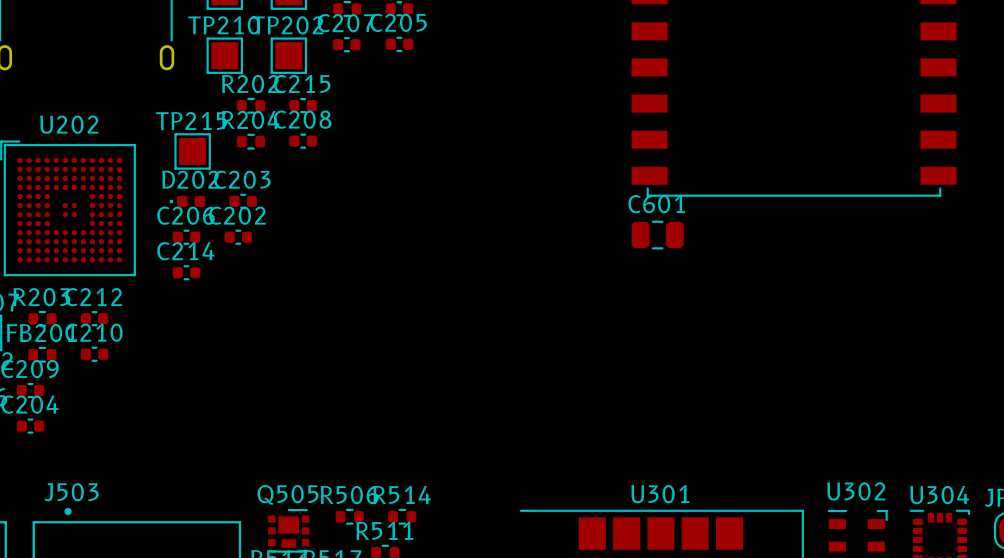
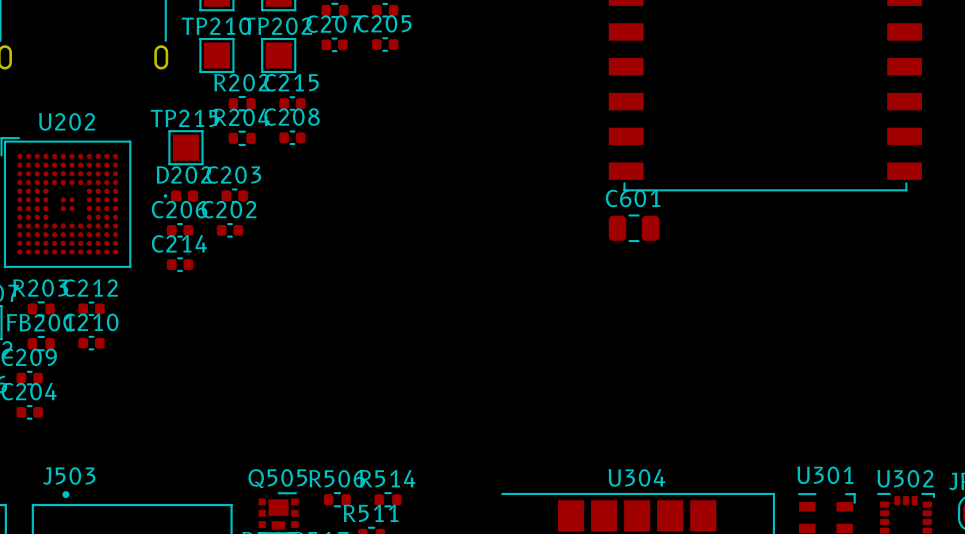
U302 name: U302 (856, 491) -> U301 (825, 475)
U301 name: U301 (660, 494) -> U304 (636, 477)
U304 name: U304 (939, 495) -> U302 (905, 478)

